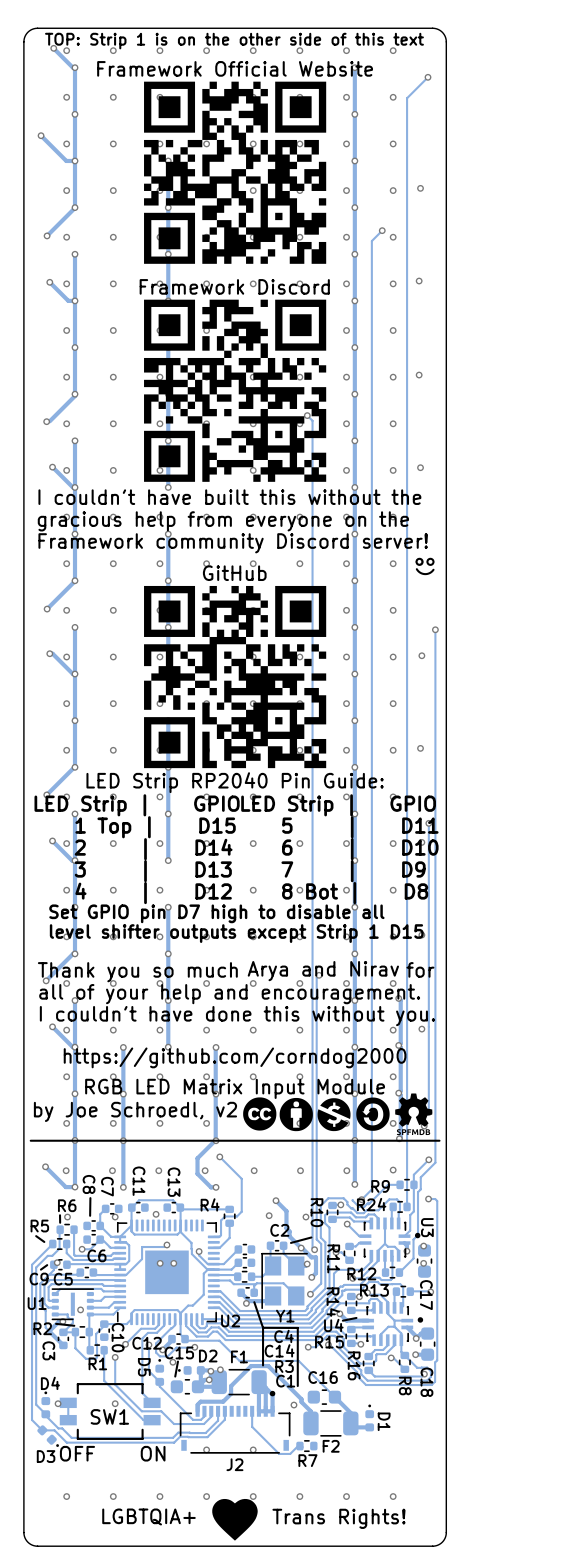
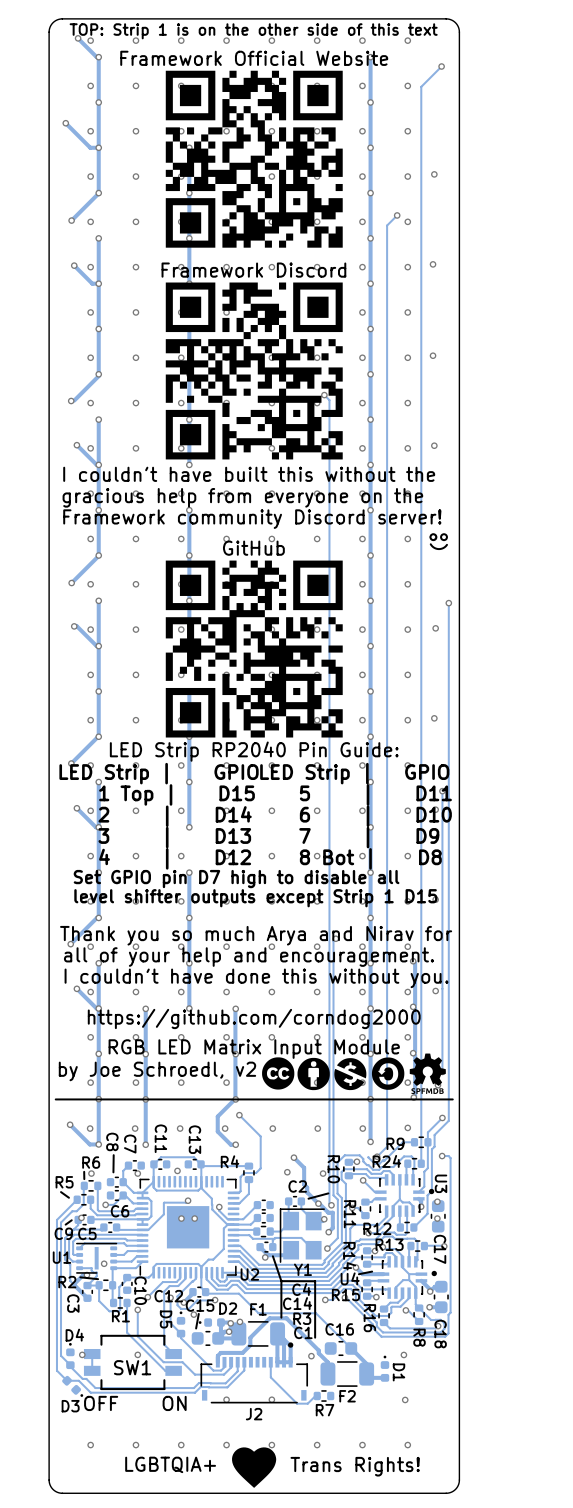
text: Arya and Nirav (323, 971) -> none
text: Thank you so much for (236, 972) -> Thank you so much Arya and Nirav for (256, 935)
via: none -> (403, 1354)
via: none -> (405, 1399)

